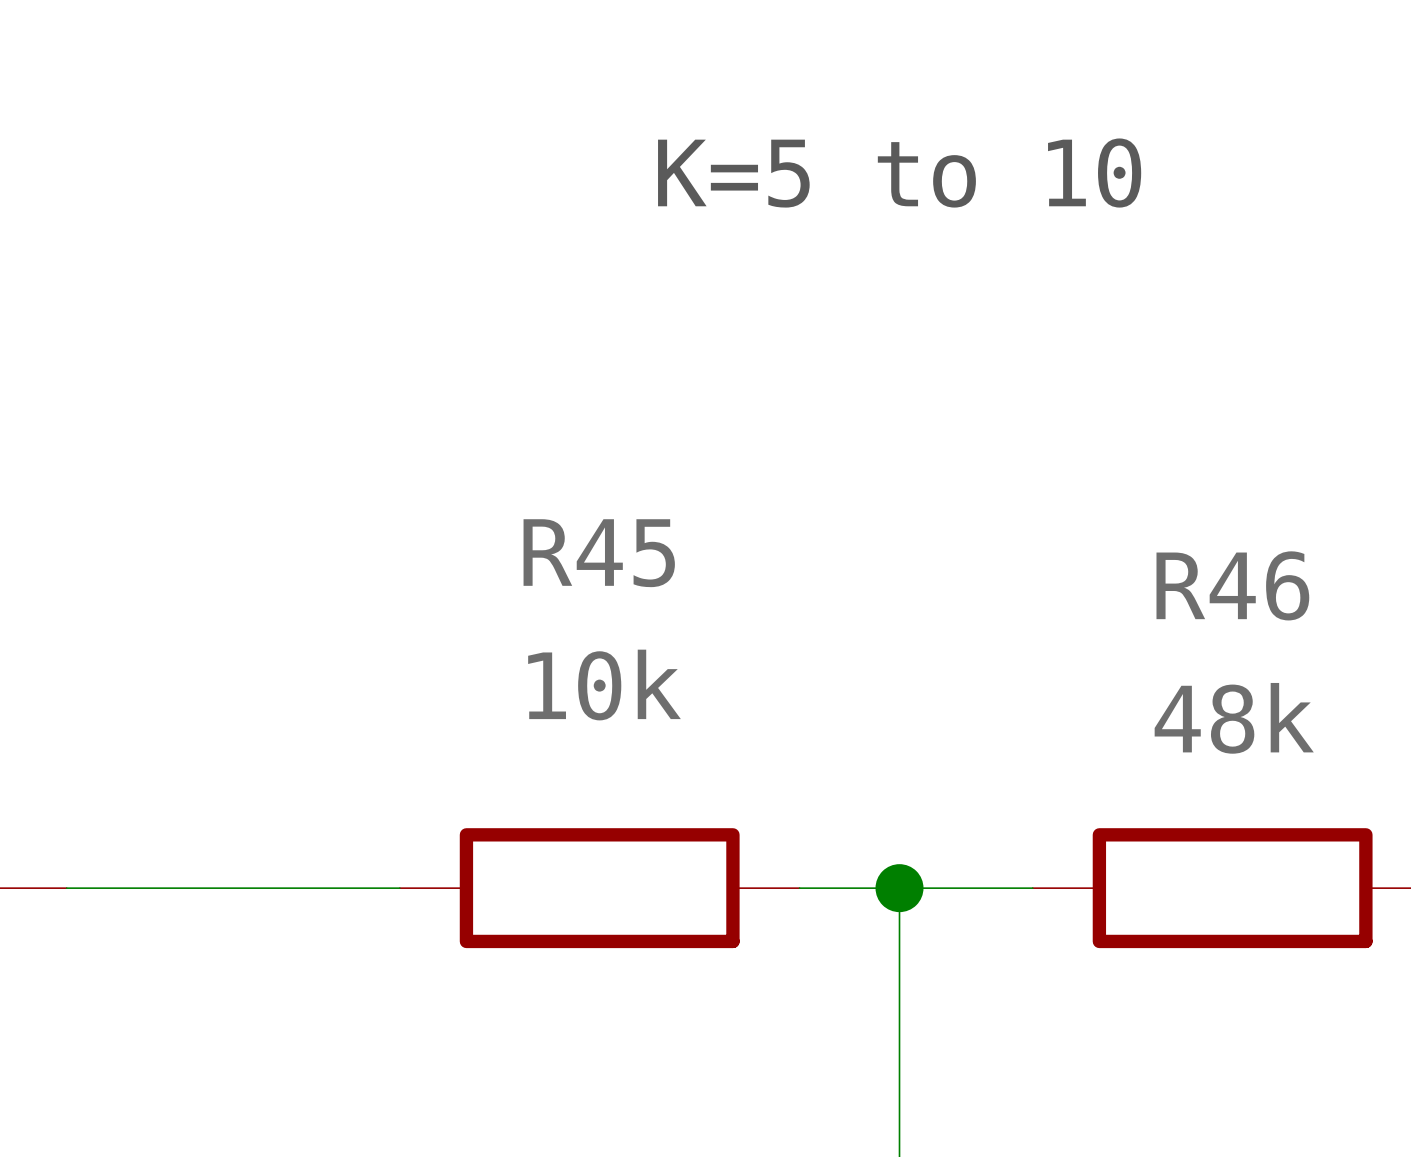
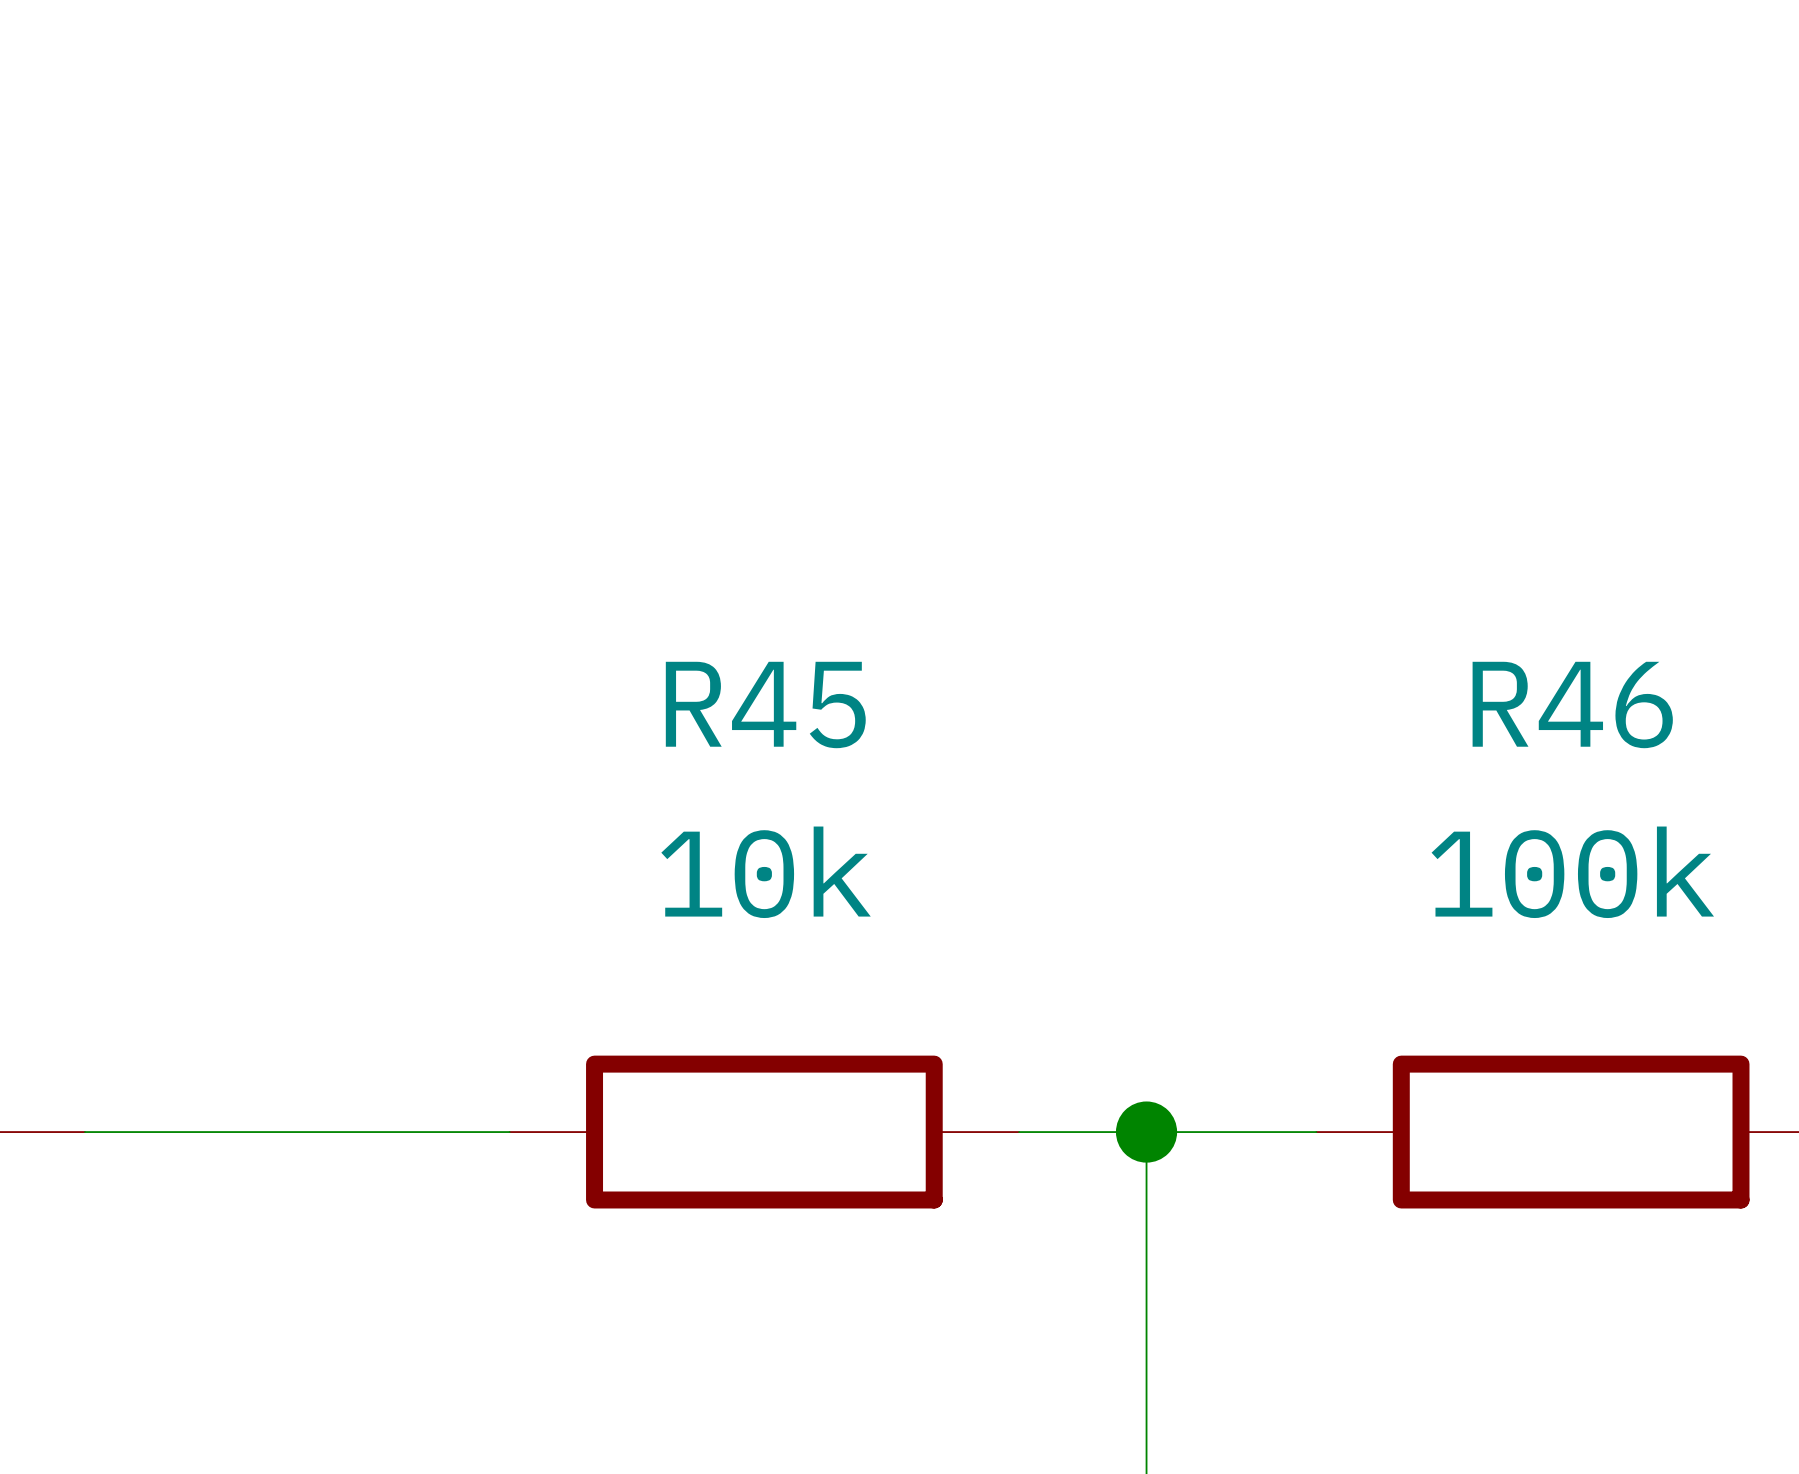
text: K=5 to 10 (899, 173) -> none
R46 name position: R46 (1232, 585) -> R46 (1572, 704)
R46 value: 48k (1234, 718) -> 100k (1572, 872)

